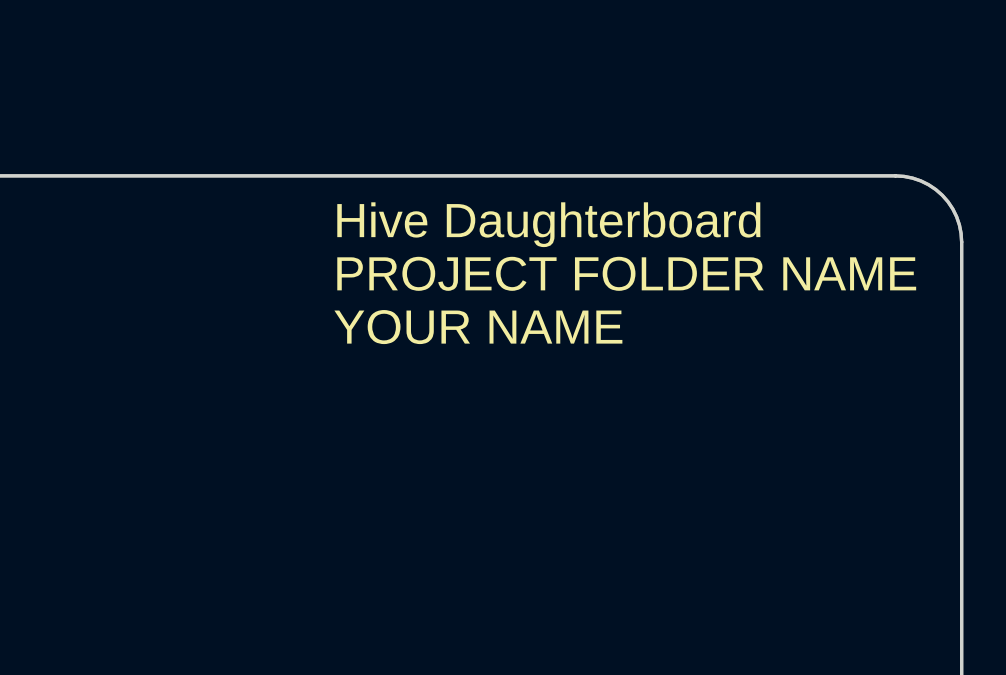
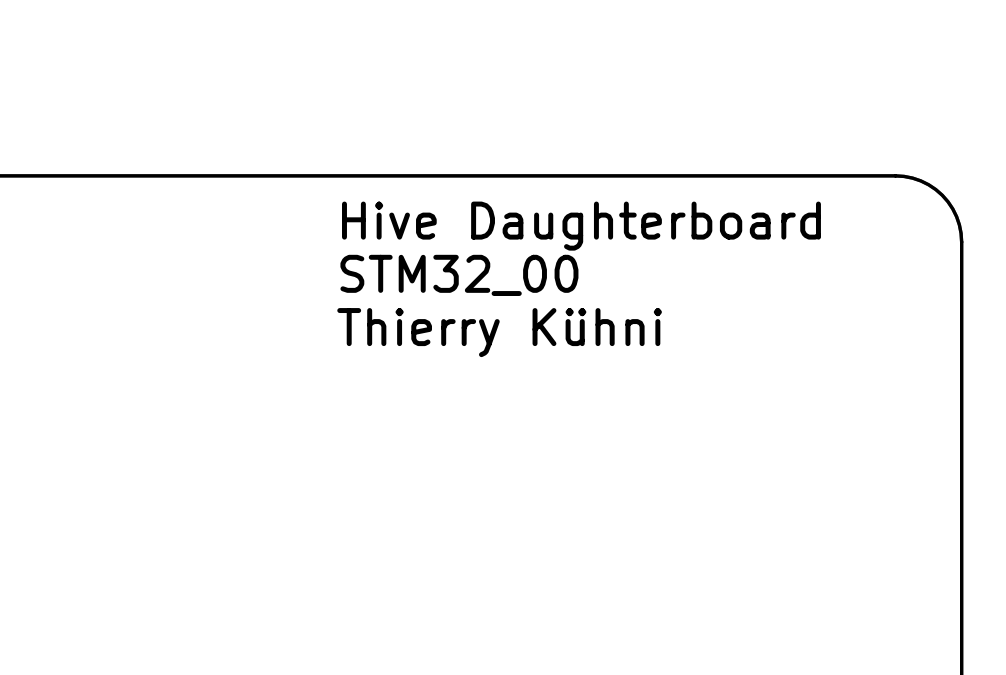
text: PROJECT FOLDER NAME (626, 273) -> STM32_00 (459, 275)
text: YOUR NAME (478, 327) -> Thierry Kühni (499, 332)

